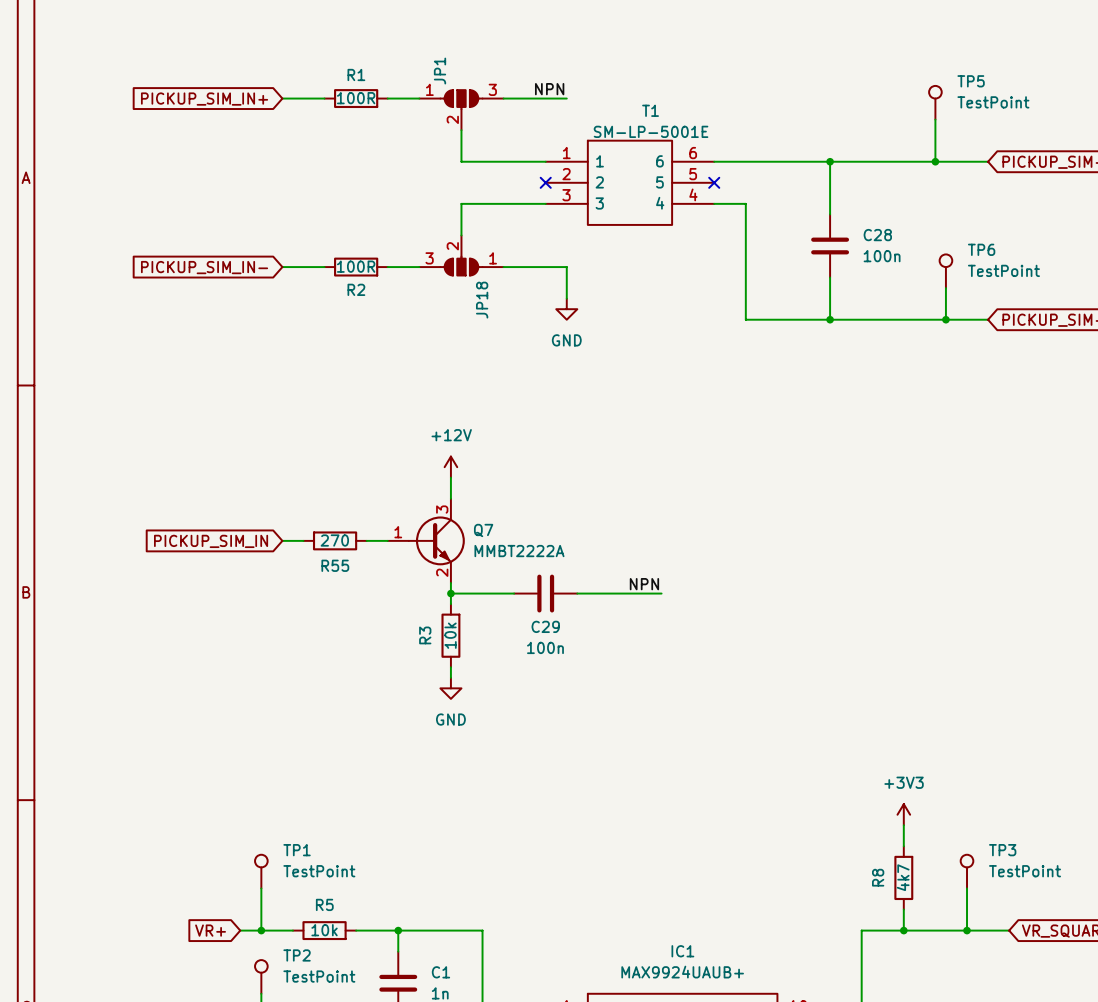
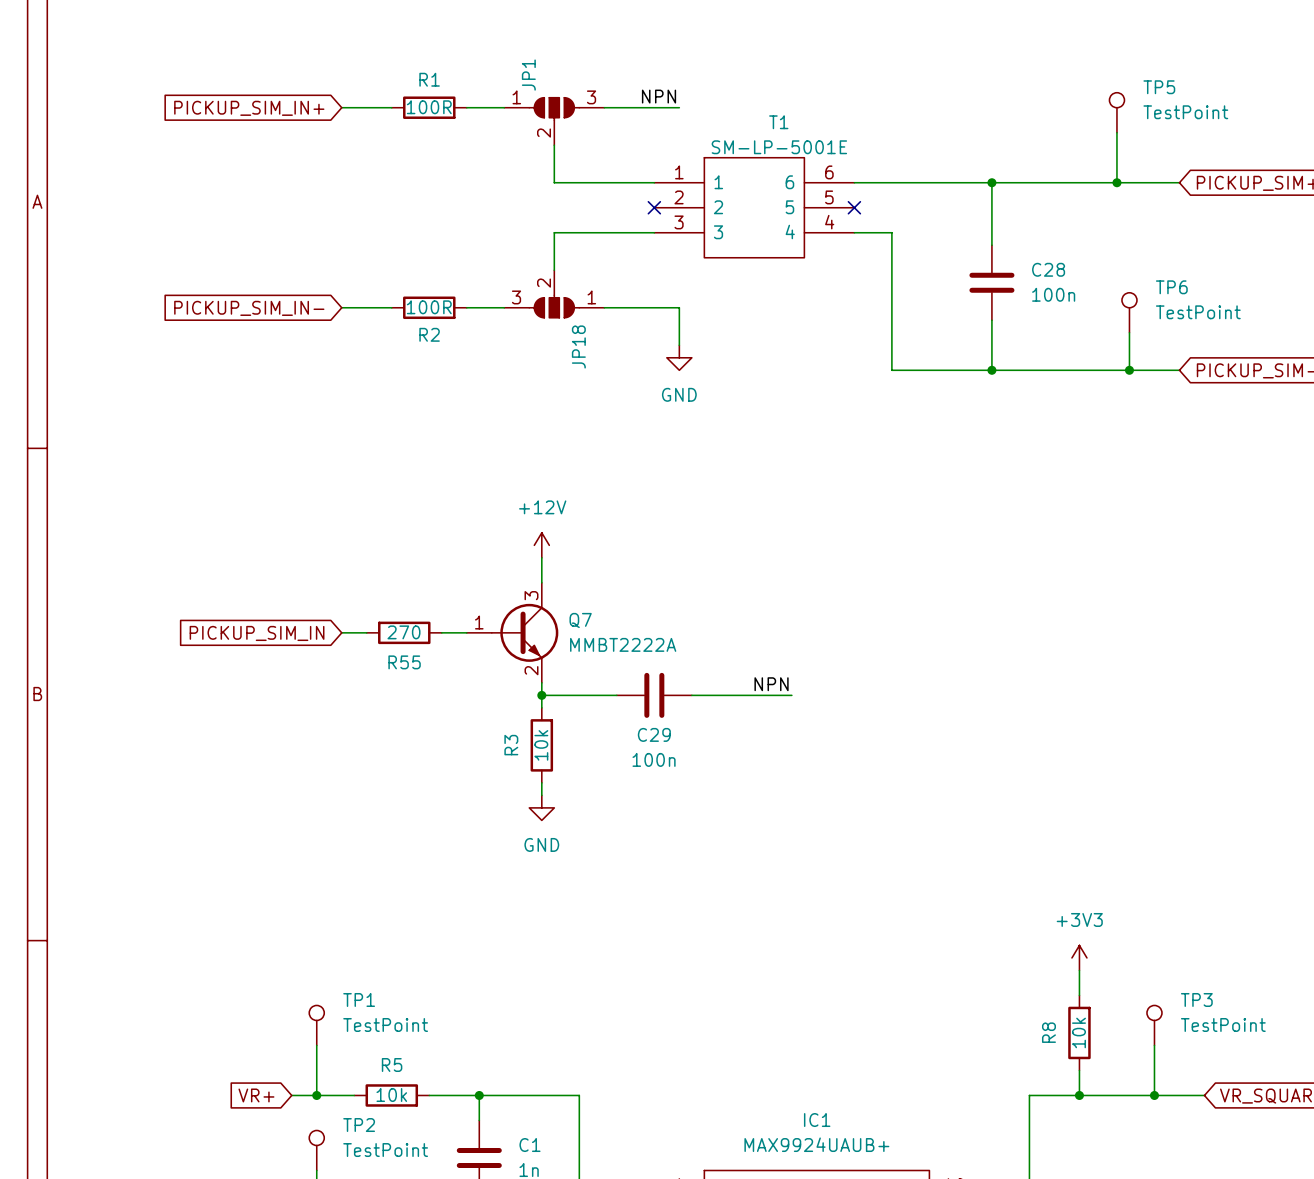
R8 value: 4k7 (903, 877) -> 10k (1078, 1032)

